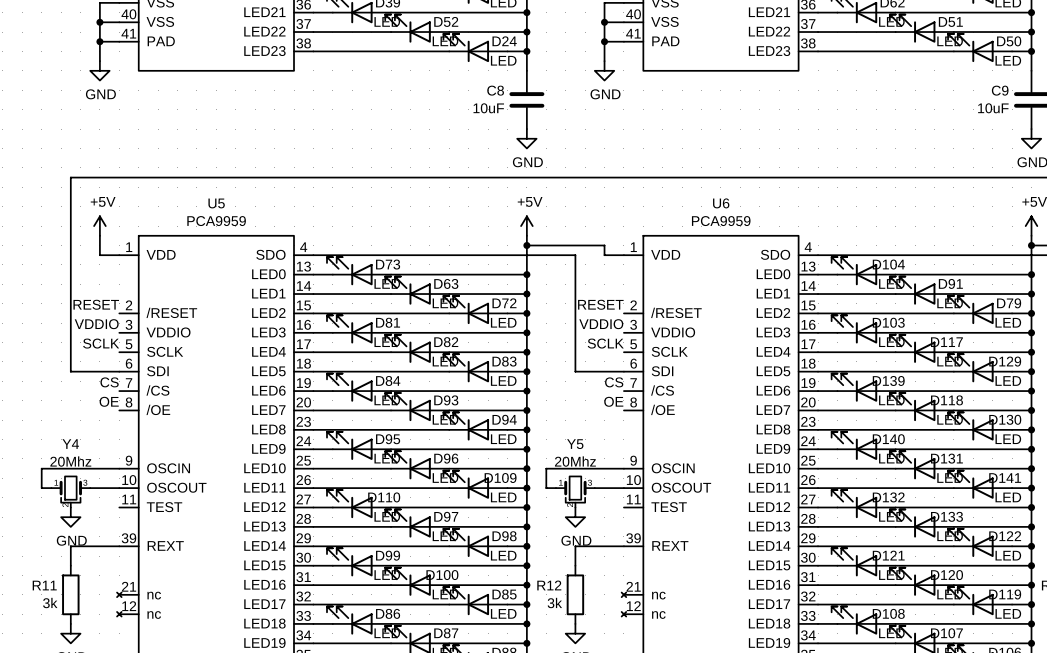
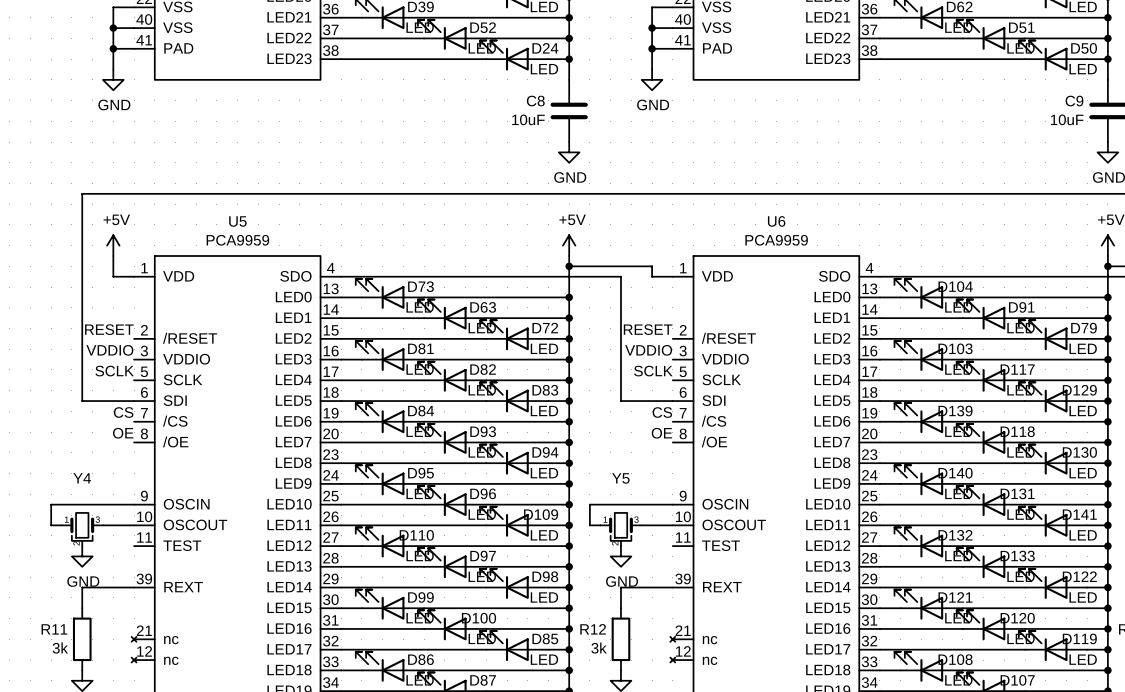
Y4 value: 20Mhz (70, 461) -> none
Y5 value: 20Mhz (575, 461) -> none

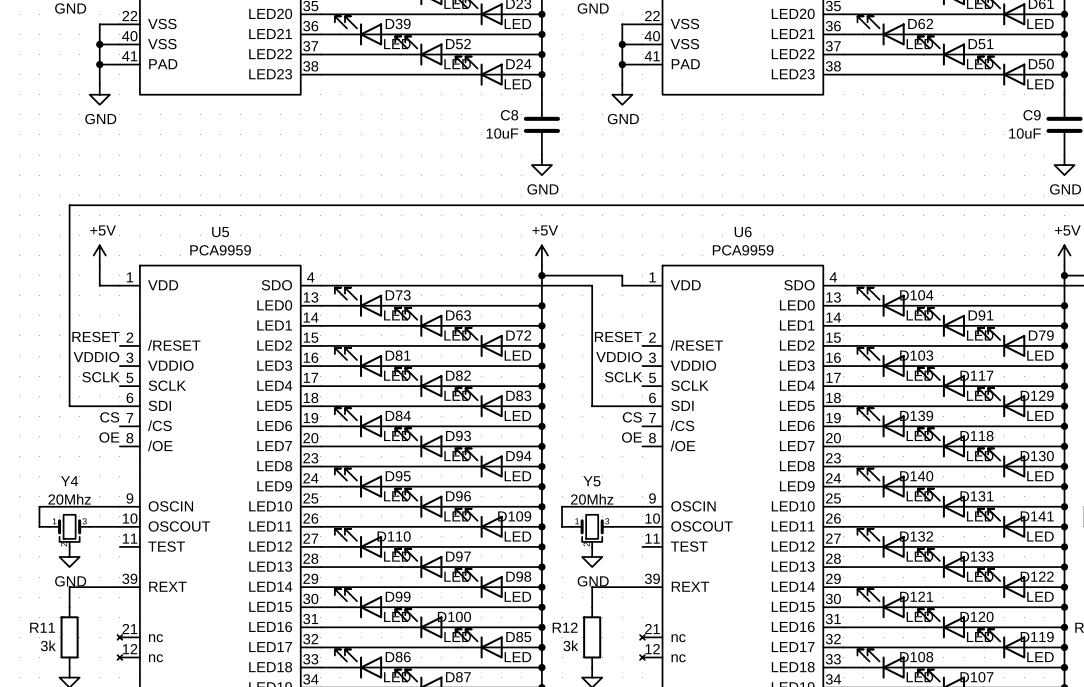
Y4 value: none -> 20Mhz (69, 499)
Y5 value: none -> 20Mhz (592, 499)

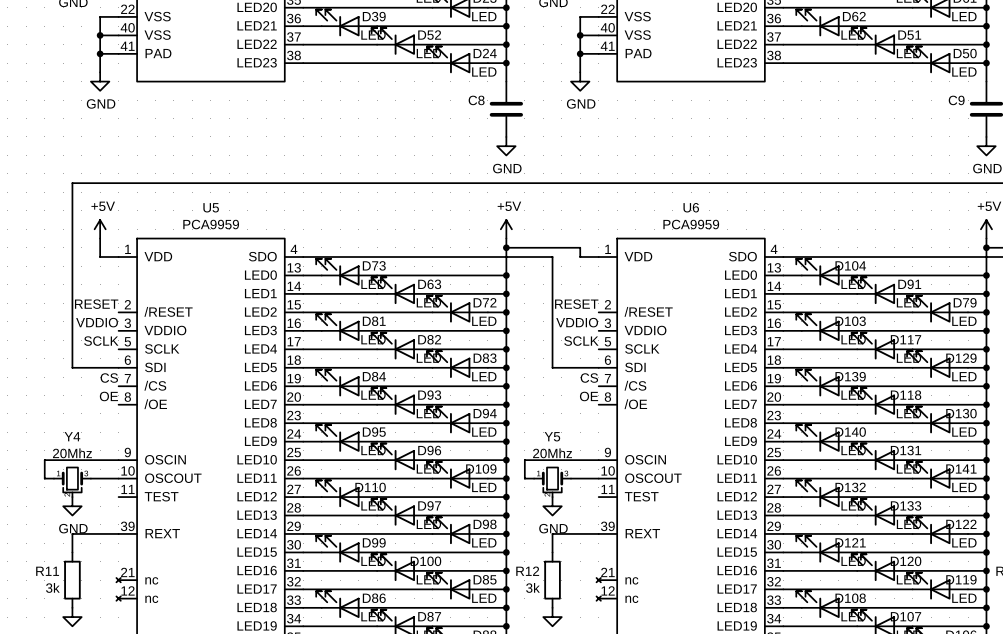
C8 value: 10uF (502, 133) -> none
C9 value: 10uF (1025, 133) -> none

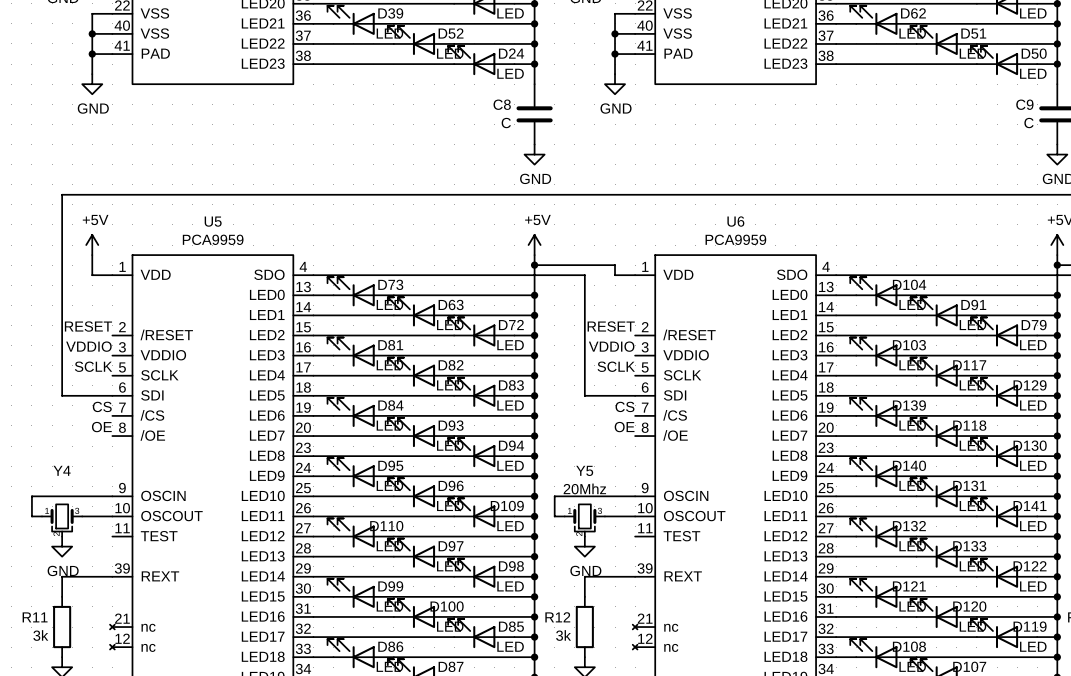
C8 value: none -> C (506, 123)
C9 value: none -> C (1029, 123)
Y4 value: 20Mhz (72, 453) -> none

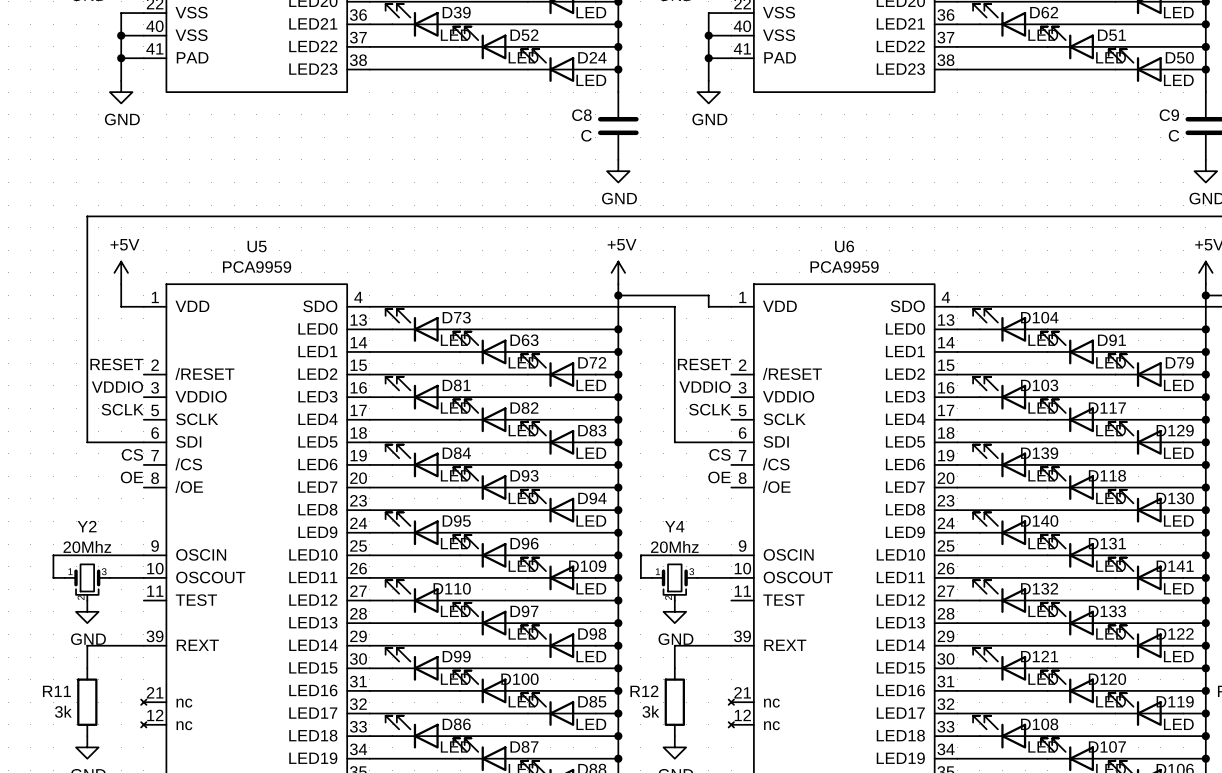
Y4 name: Y4 (62, 470) -> Y2 (87, 526)
Y5 name: Y5 (584, 470) -> Y4 (674, 526)
Y4 value: none -> 20Mhz (87, 547)

